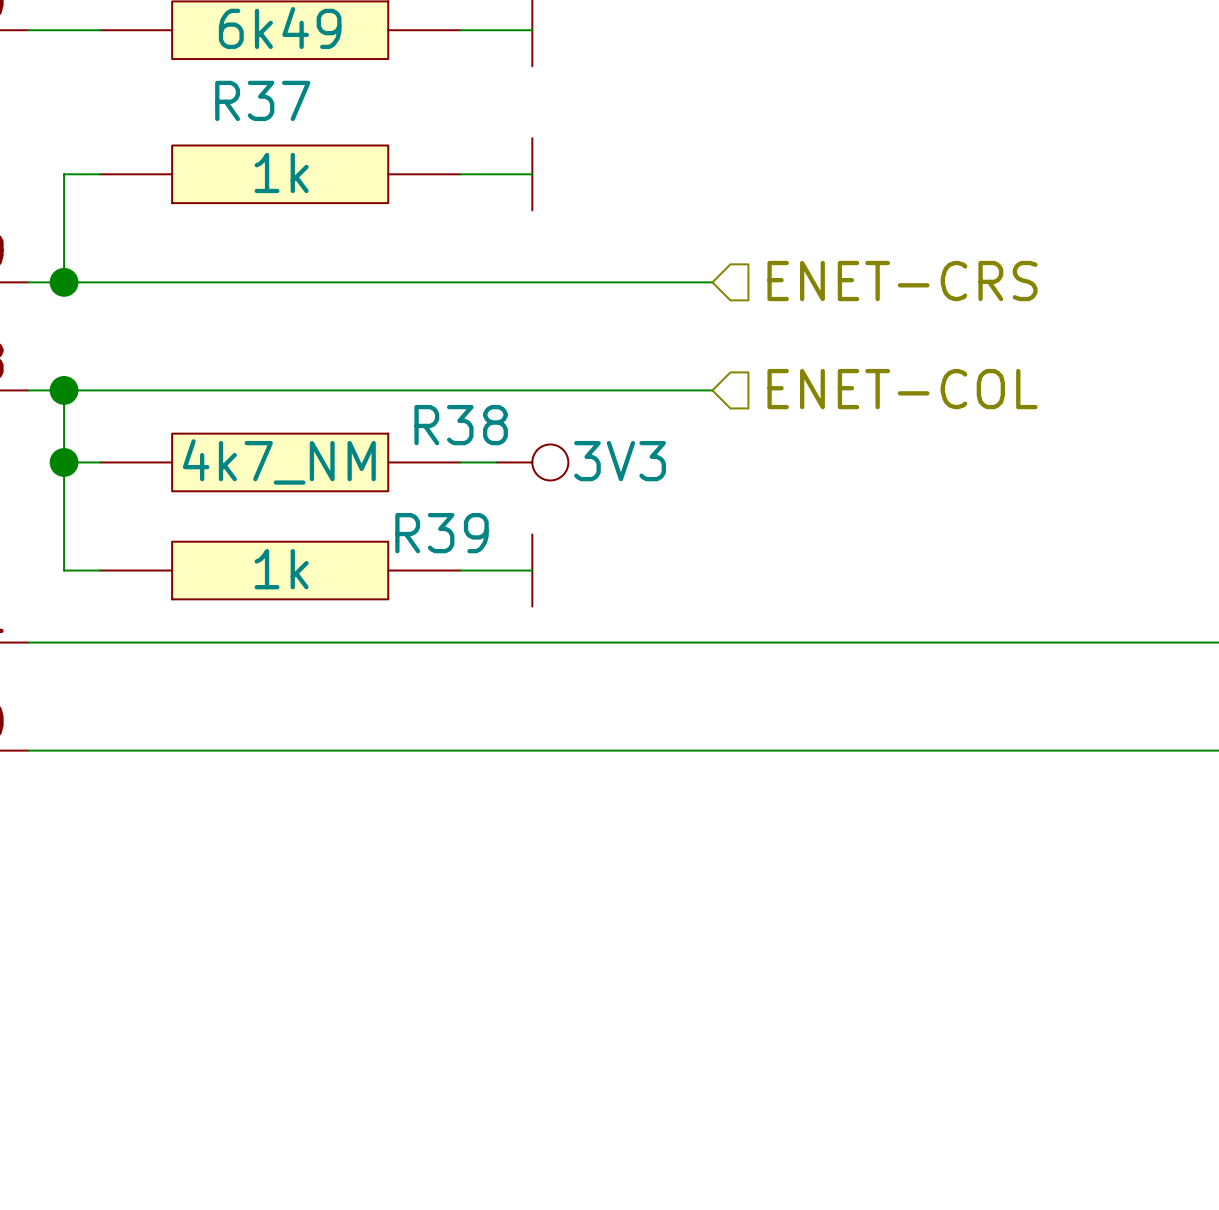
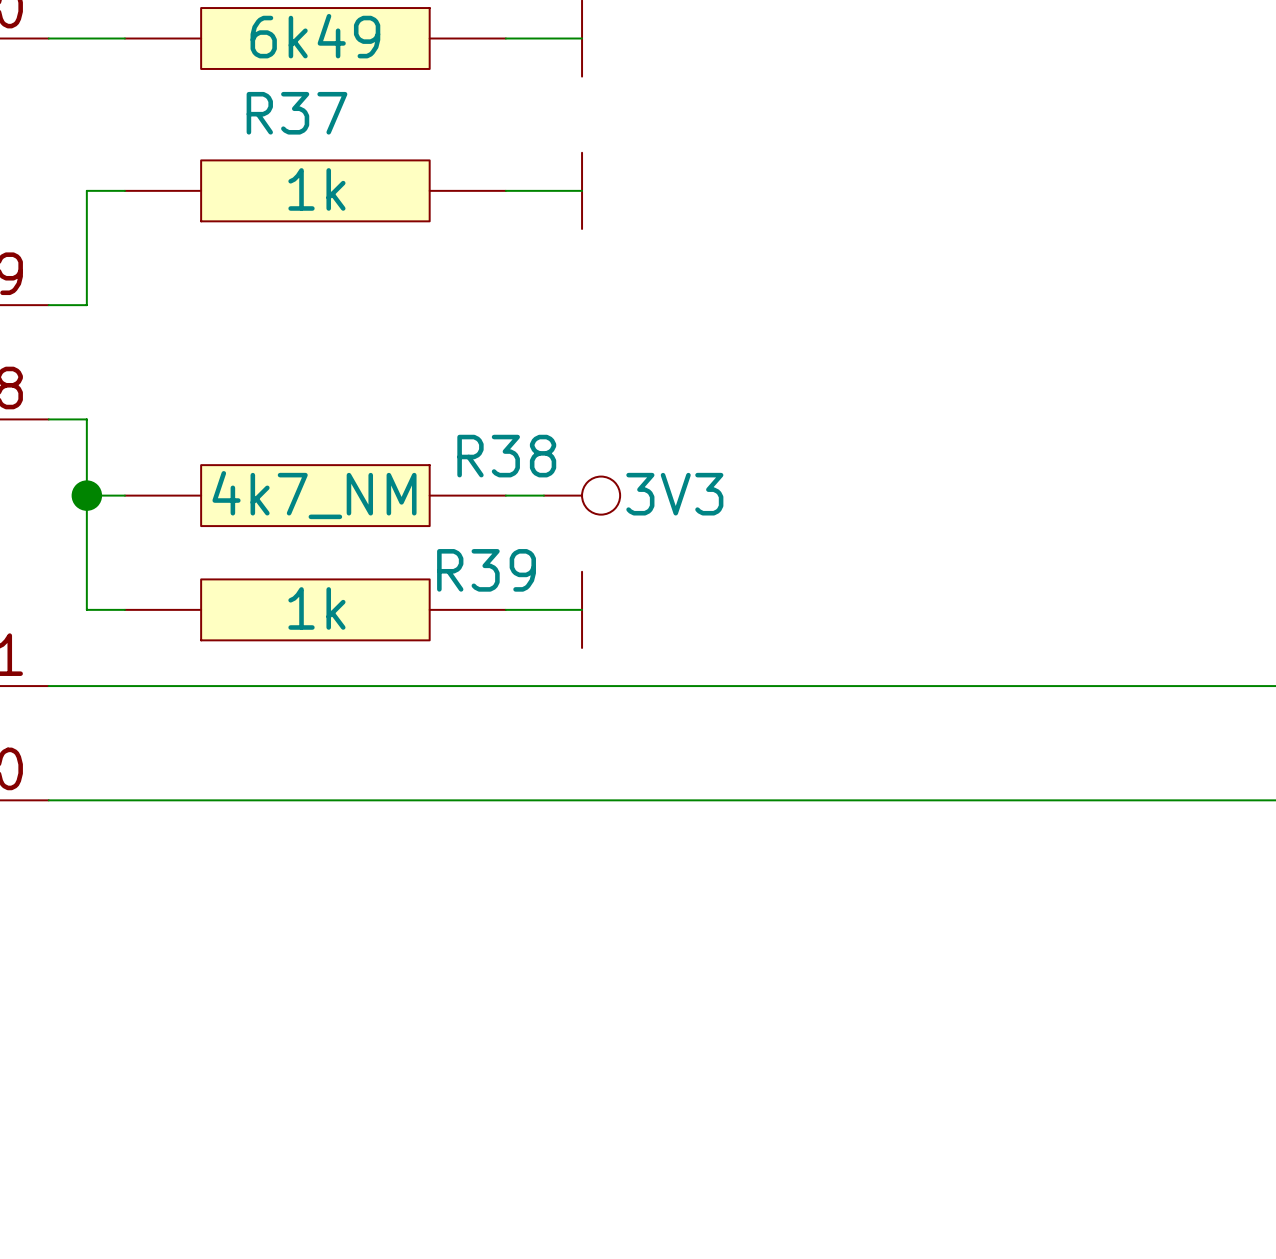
hierarchical label: ENET-CRS (902, 281) -> none
wire: (64, 282) (712, 282) -> none
junction: (64, 282) -> none
hierarchical label: ENET-COL (902, 389) -> none
wire: (64, 390) (712, 390) -> none
junction: (64, 390) -> none

